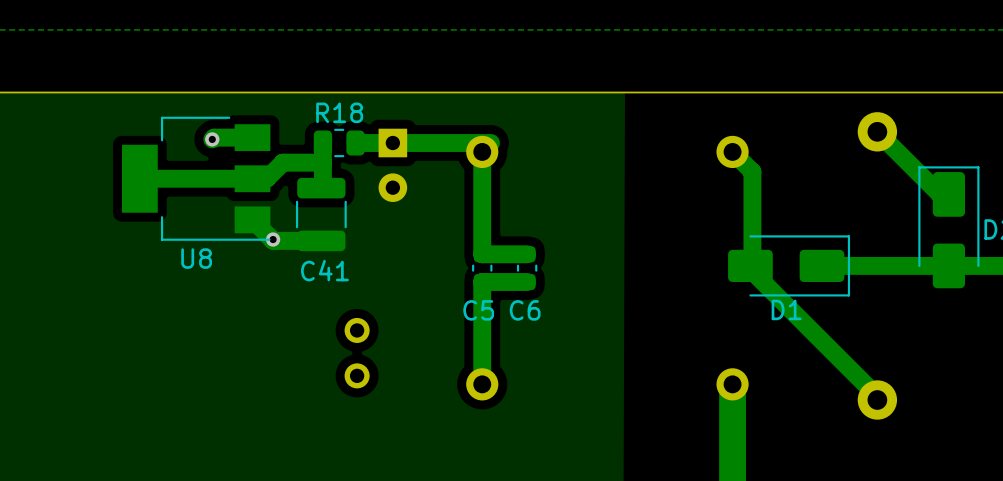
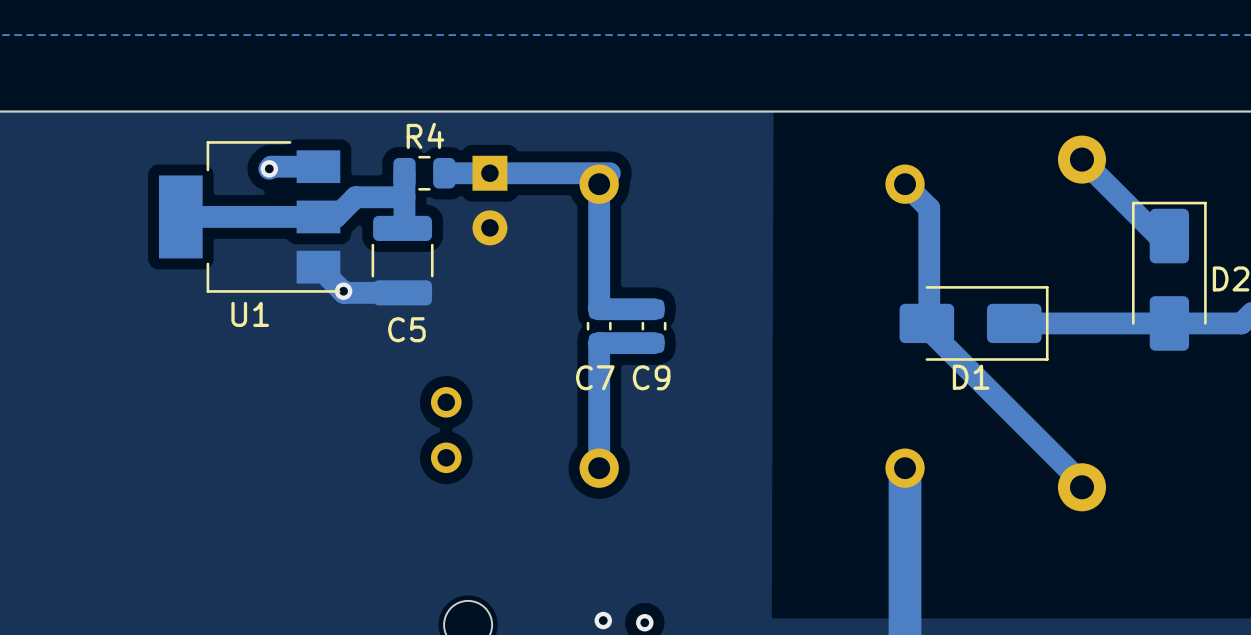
R18 name: R18 (339, 112) -> R4 (425, 135)
U8 name: U8 (196, 258) -> U1 (250, 314)
C41 name: C41 (324, 270) -> C5 (406, 329)
C5 name: C5 (478, 310) -> C7 (595, 377)
C6 name: C6 (525, 310) -> C9 (651, 377)

